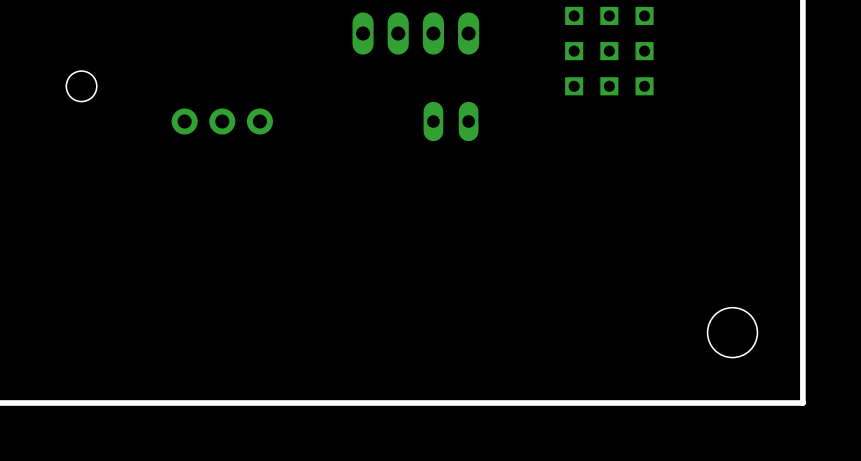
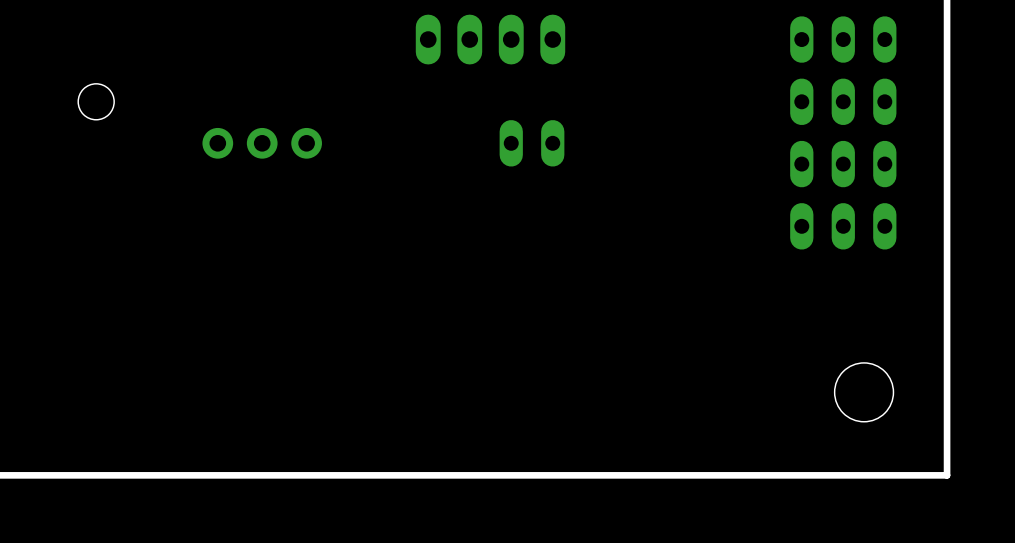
part: (609, 15) -> none
part: none -> (843, 39)
part: (609, 51) -> none
part: (609, 86) -> none
part: none -> (843, 101)
part: none -> (843, 164)
part: none -> (843, 226)

